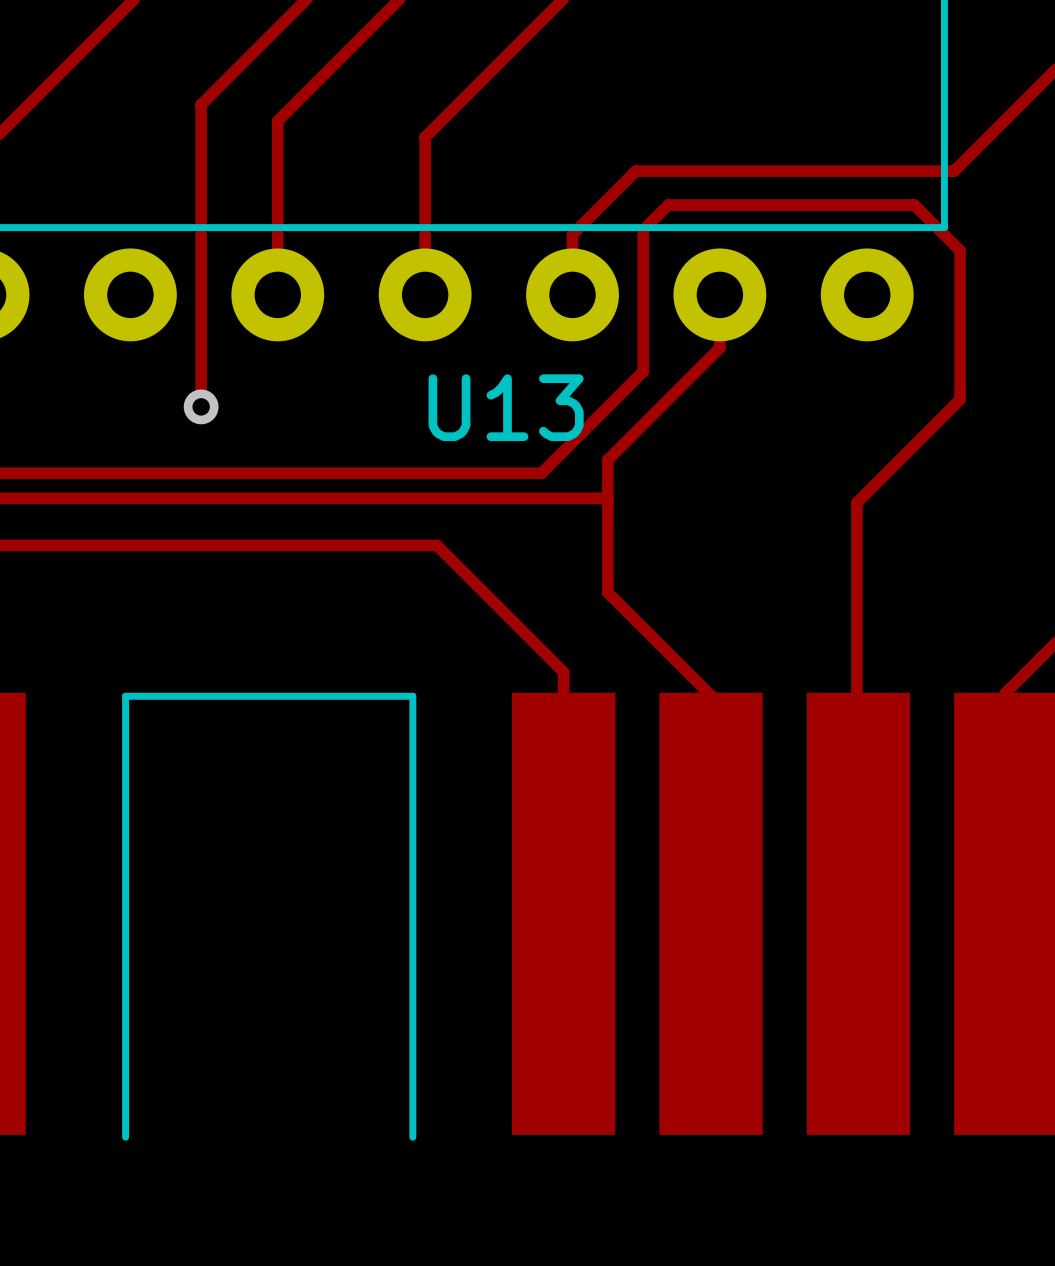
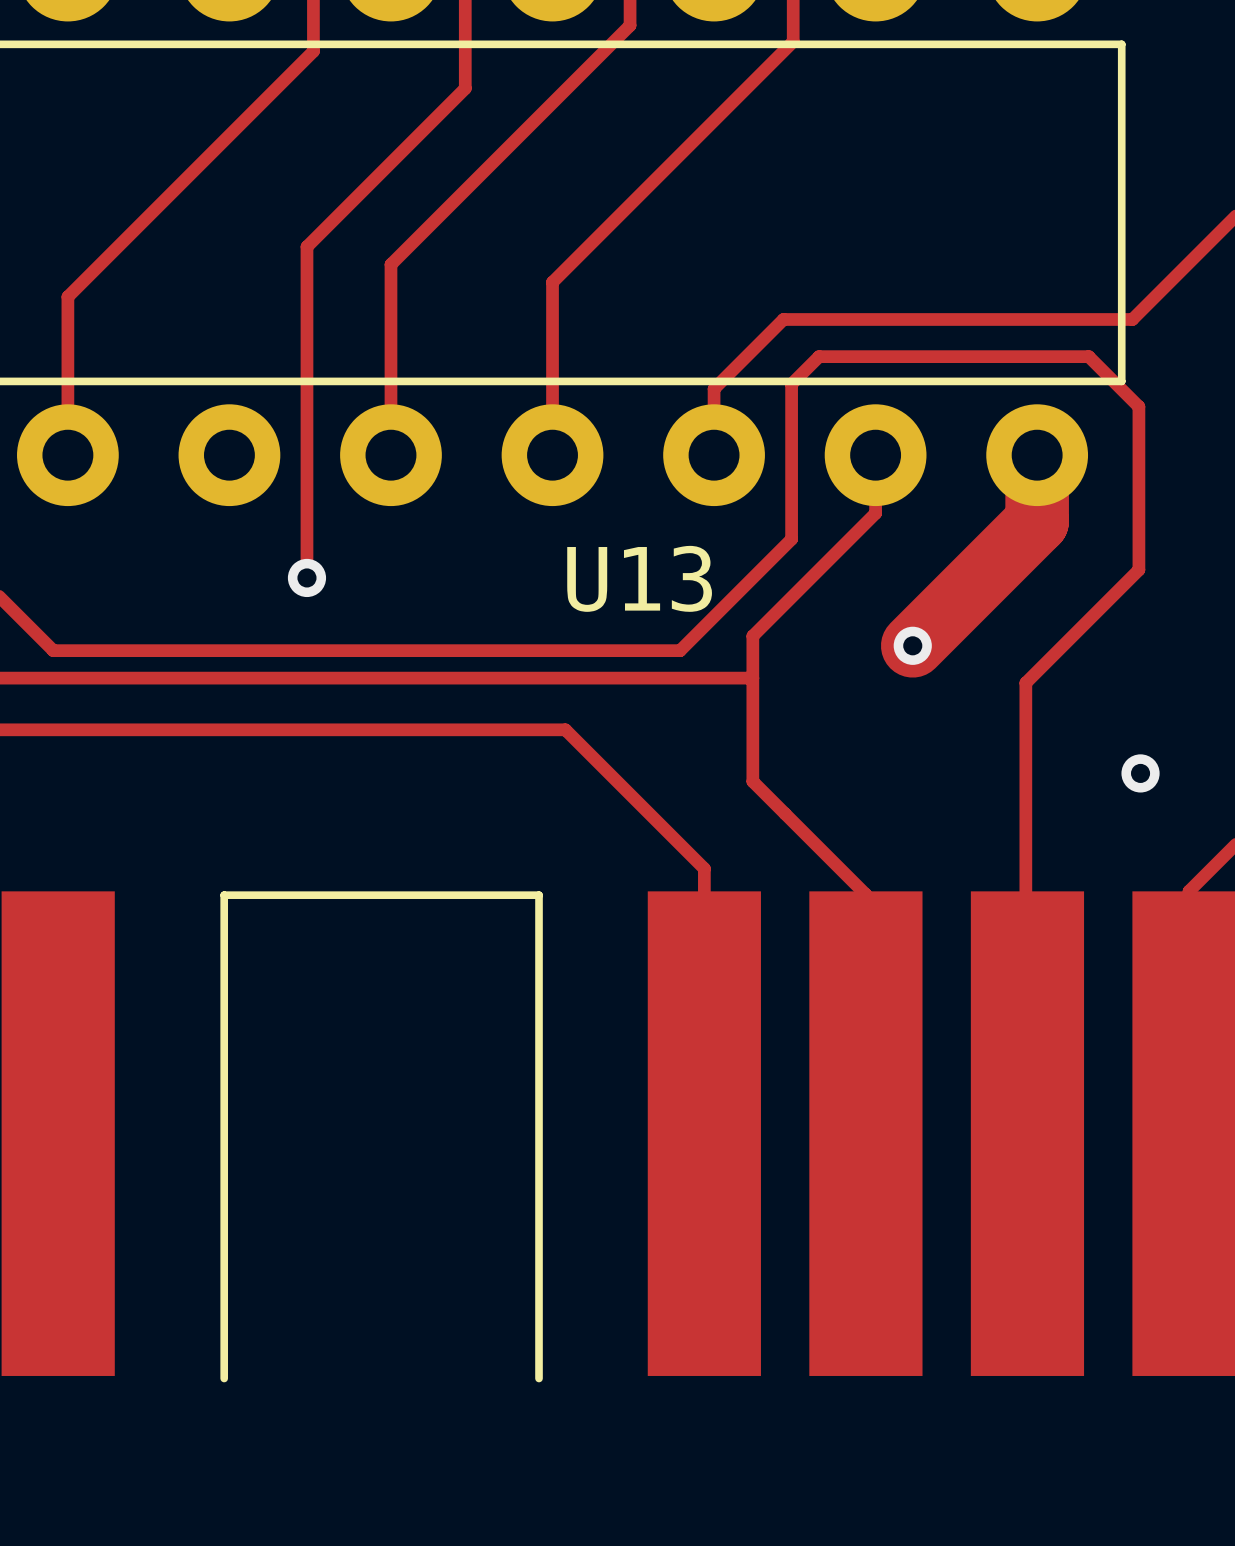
track: none -> (1037, 455) (1037, 521) (912, 645)
via: none -> (912, 645)
via: none -> (1140, 773)

